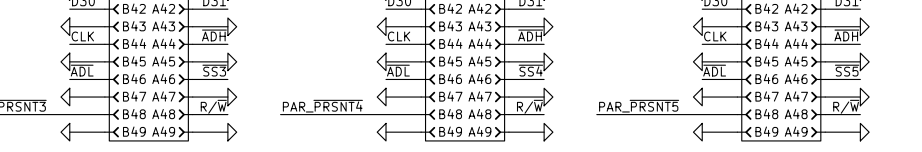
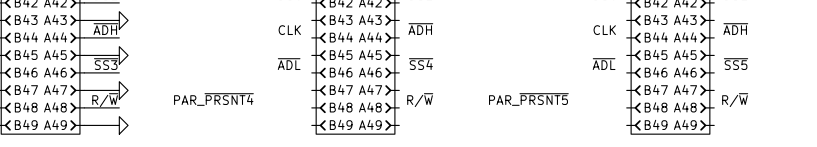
wire: (386, 9) (421, 9) -> none
wire: (508, 9) (544, 9) -> none
wire: (702, 9) (737, 9) -> none
wire: (825, 9) (860, 9) -> none
power symbol: (381, 26) -> none
wire: (386, 26) (421, 26) -> none
wire: (508, 26) (544, 26) -> none
power symbol: (548, 26) -> none
power symbol: (697, 26) -> none
wire: (702, 26) (737, 26) -> none
wire: (825, 26) (860, 26) -> none
power symbol: (864, 26) -> none
wire: (386, 44) (421, 44) -> none
wire: (508, 44) (544, 44) -> none
wire: (702, 44) (737, 44) -> none
wire: (825, 44) (860, 44) -> none
power symbol: (381, 61) -> none
wire: (386, 61) (421, 61) -> none
wire: (508, 61) (544, 61) -> none
power symbol: (548, 61) -> none
power symbol: (697, 61) -> none
wire: (702, 61) (737, 61) -> none
wire: (825, 61) (860, 61) -> none
power symbol: (864, 61) -> none
wire: (386, 79) (421, 79) -> none
wire: (508, 79) (544, 79) -> none
wire: (702, 79) (737, 79) -> none
wire: (825, 79) (860, 79) -> none
power symbol: (381, 97) -> none
wire: (386, 97) (421, 97) -> none
wire: (508, 97) (544, 97) -> none
power symbol: (548, 97) -> none
power symbol: (697, 97) -> none
wire: (702, 97) (737, 97) -> none
wire: (825, 97) (860, 97) -> none
power symbol: (864, 97) -> none
wire: (280, 114) (421, 114) -> none
wire: (508, 114) (544, 114) -> none
wire: (596, 114) (737, 114) -> none
wire: (825, 114) (860, 114) -> none
power symbol: (381, 132) -> none
wire: (386, 132) (421, 132) -> none
wire: (508, 132) (544, 132) -> none
power symbol: (548, 132) -> none
power symbol: (697, 132) -> none
wire: (702, 132) (737, 132) -> none
wire: (825, 132) (860, 132) -> none
power symbol: (864, 132) -> none

